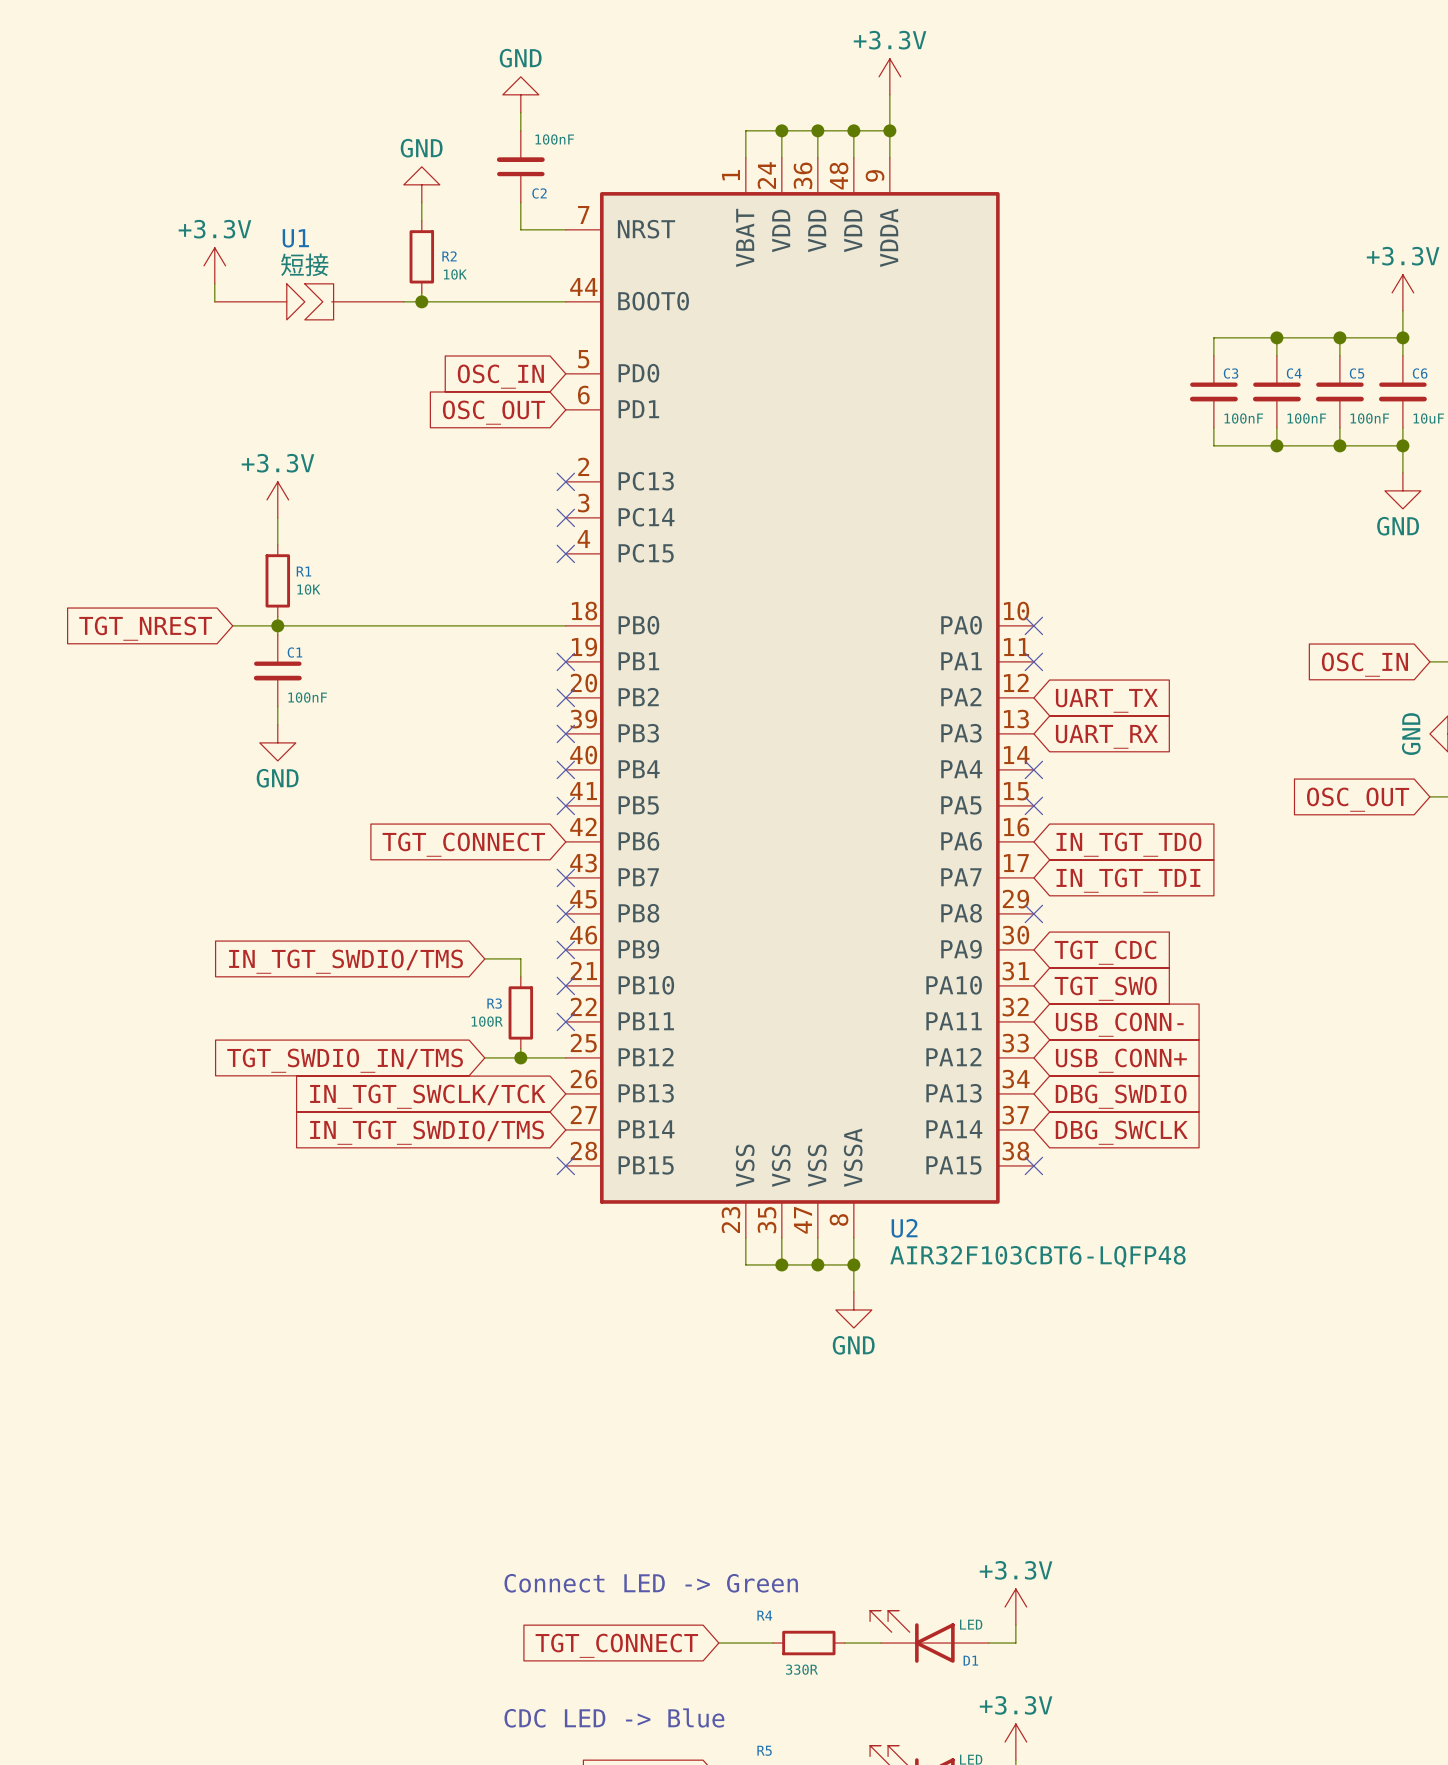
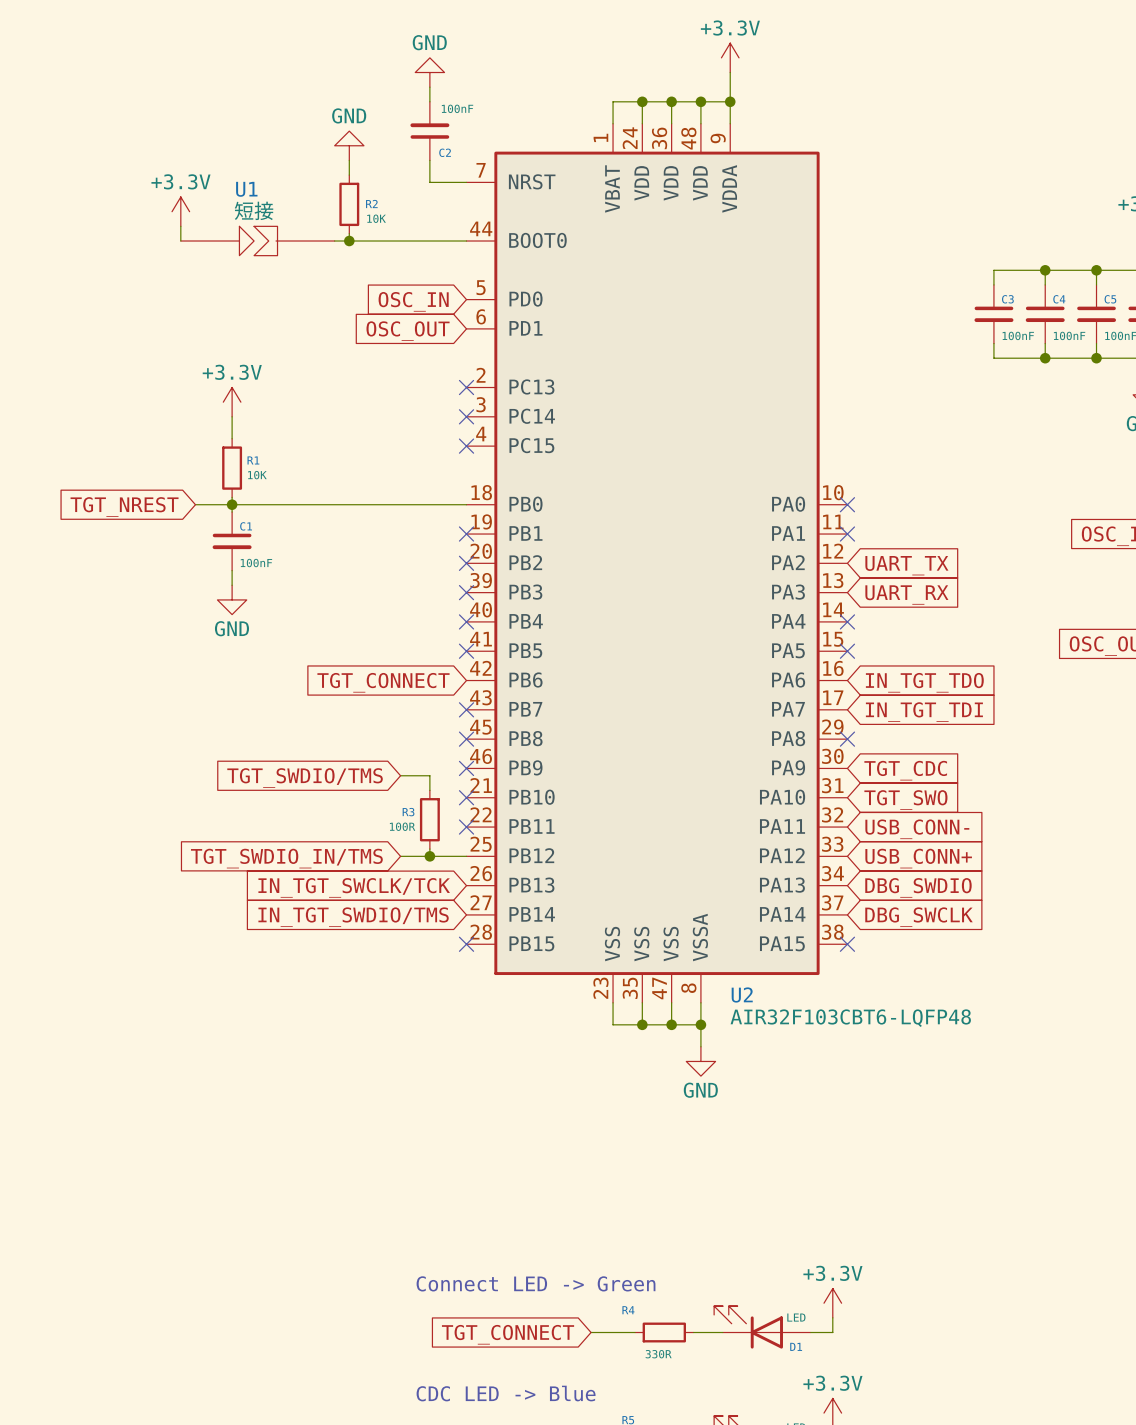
global label: IN_TGT_SWDIO/TMS (346, 961) -> TGT_SWDIO/TMS (305, 778)

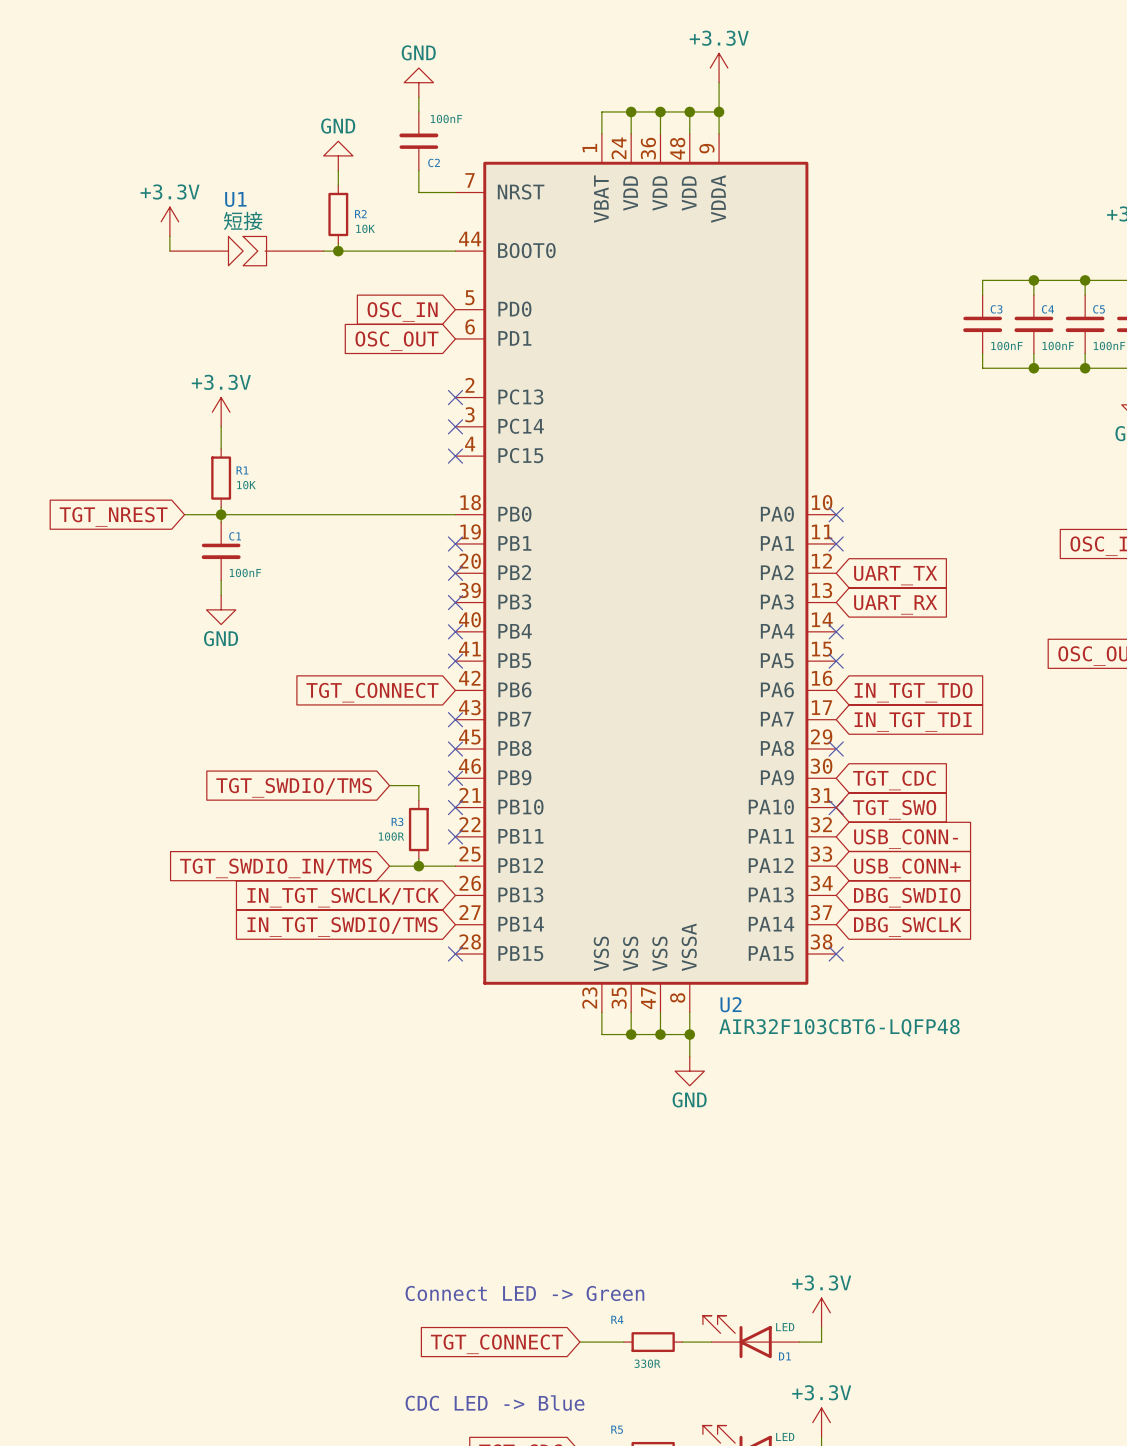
no-connect mark: none -> (836, 807)

